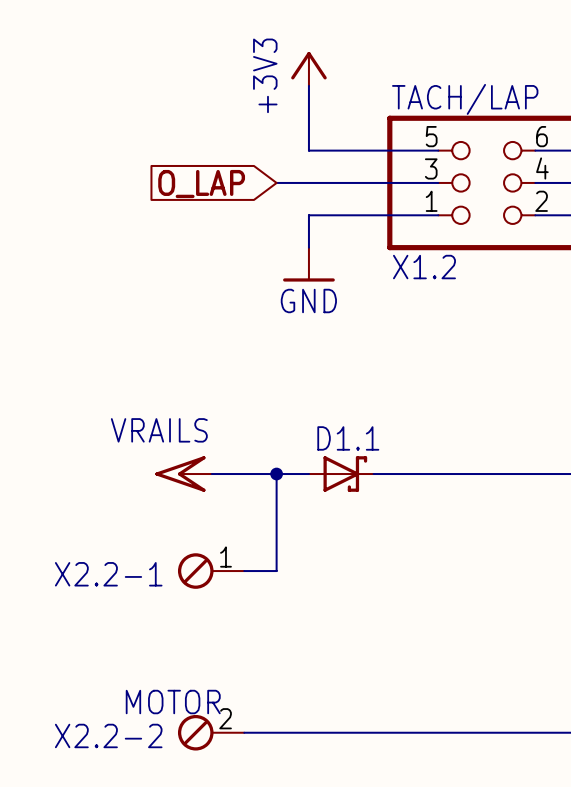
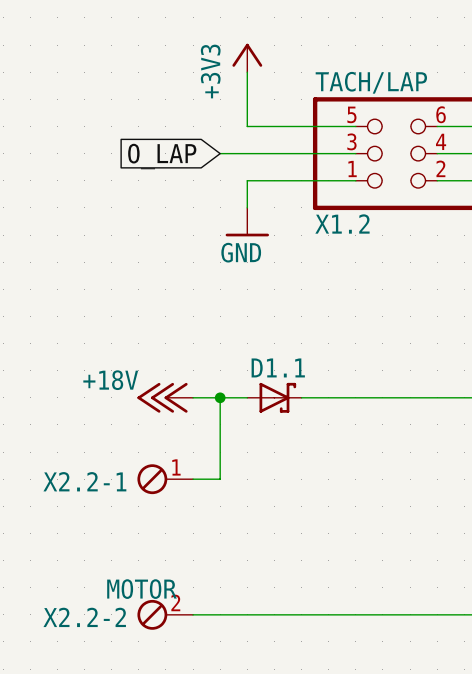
power symbol: VRAILS (183, 474) -> none
power symbol: none -> +18V (165, 397)

